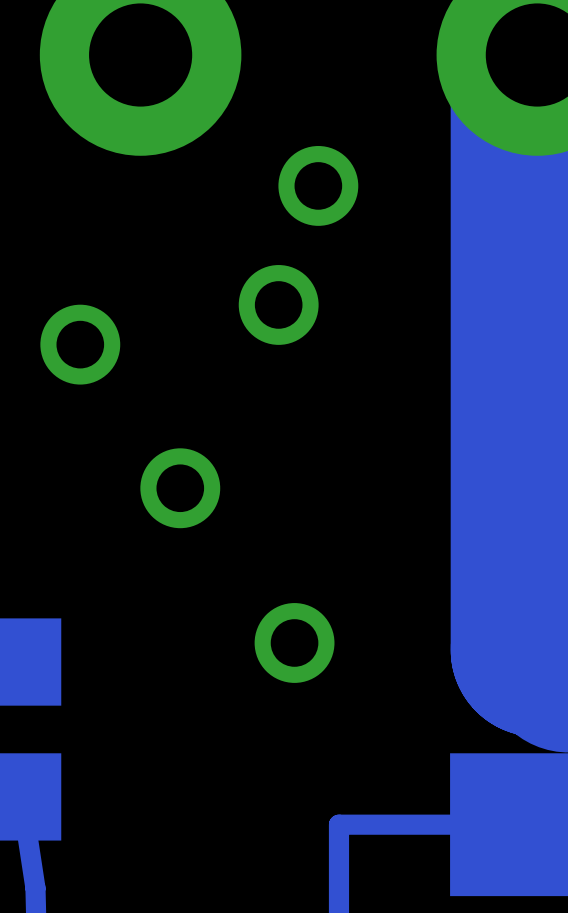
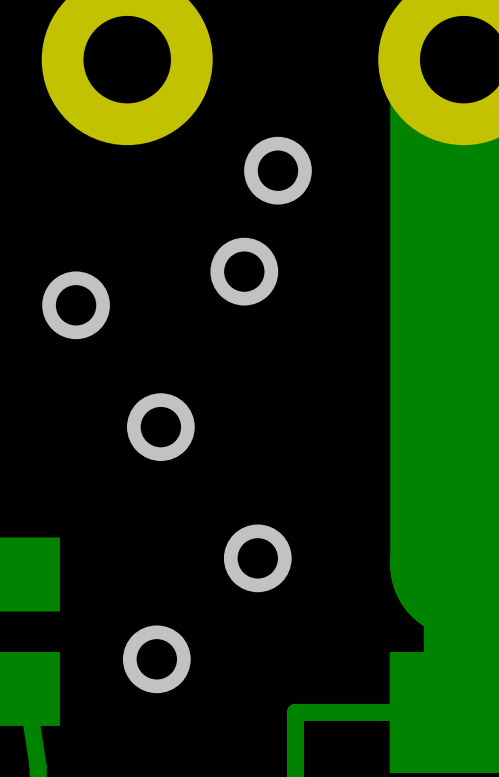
via: none -> (156, 659)

